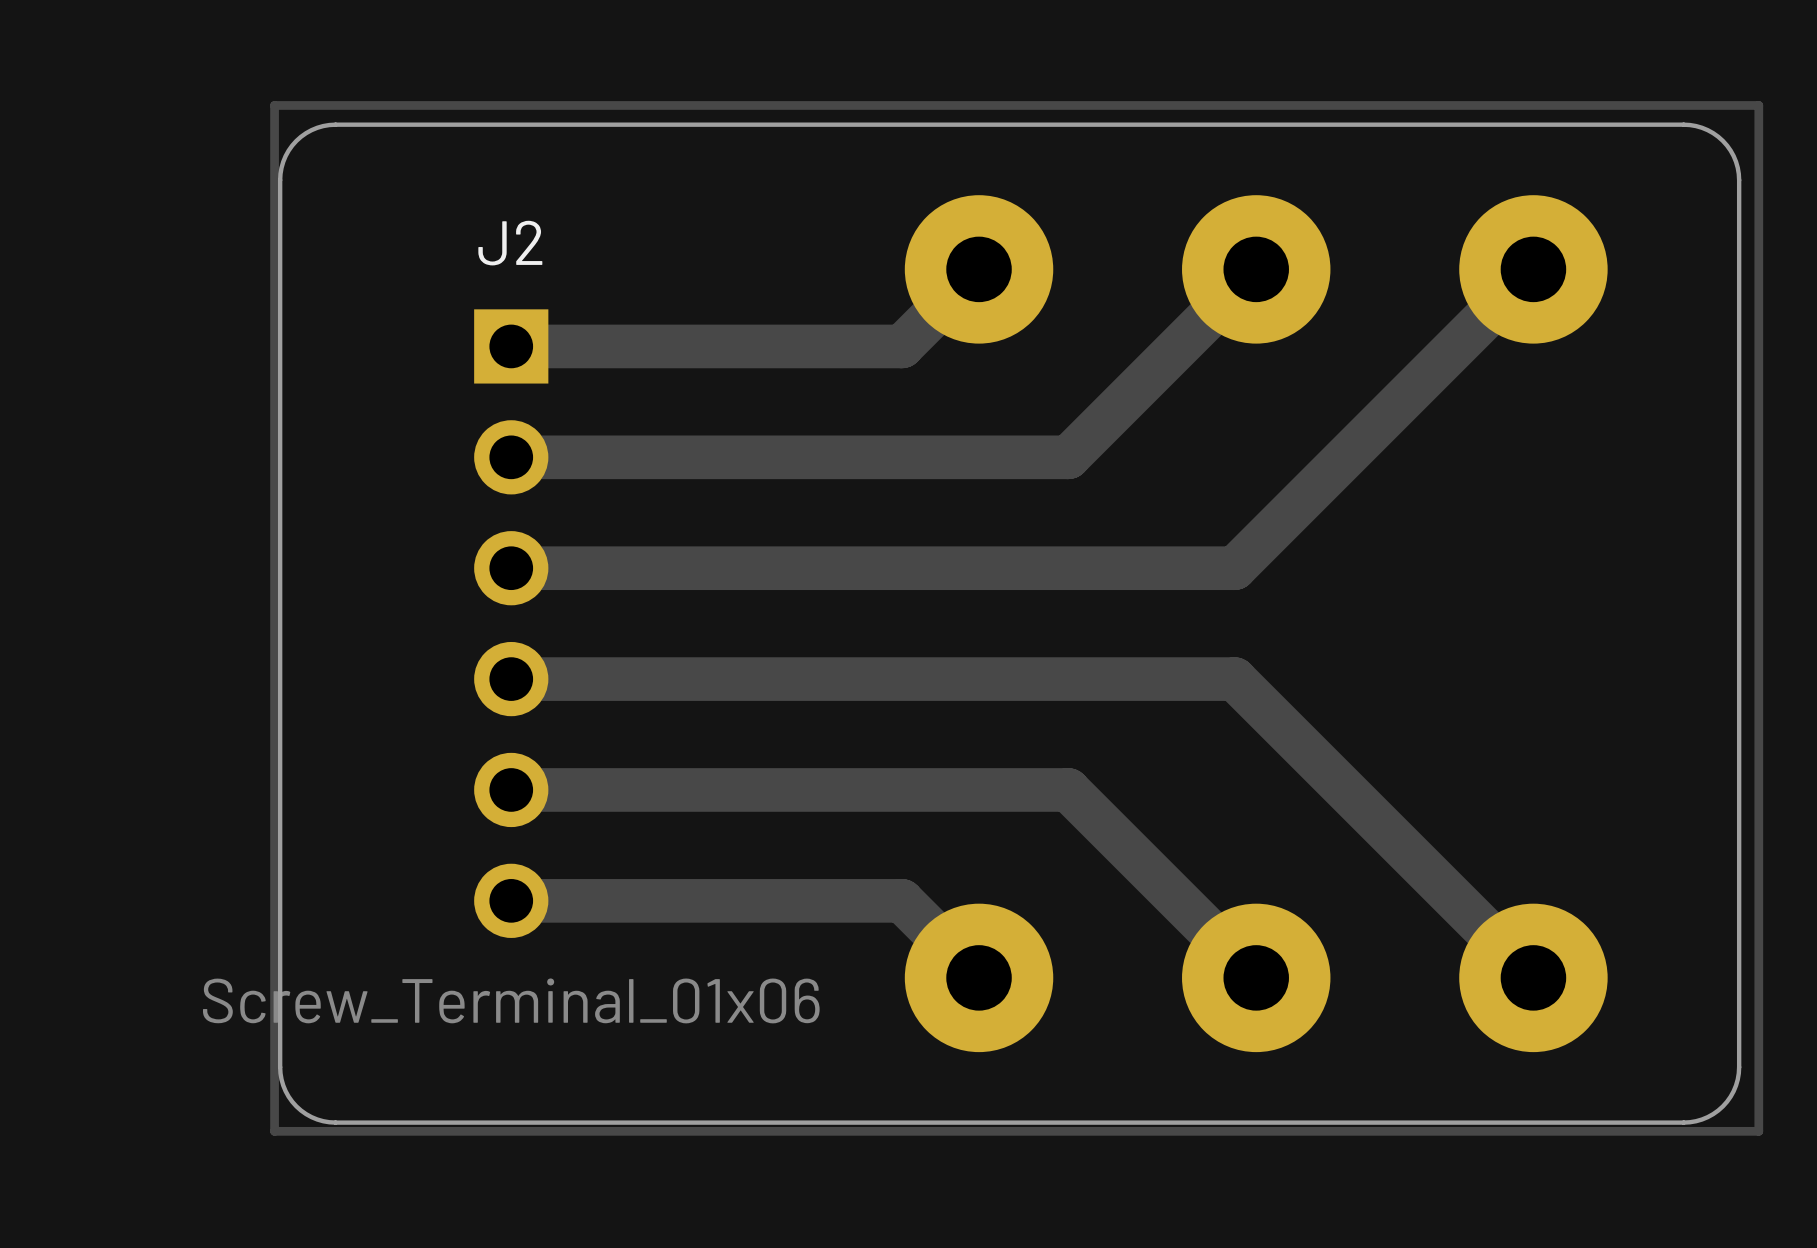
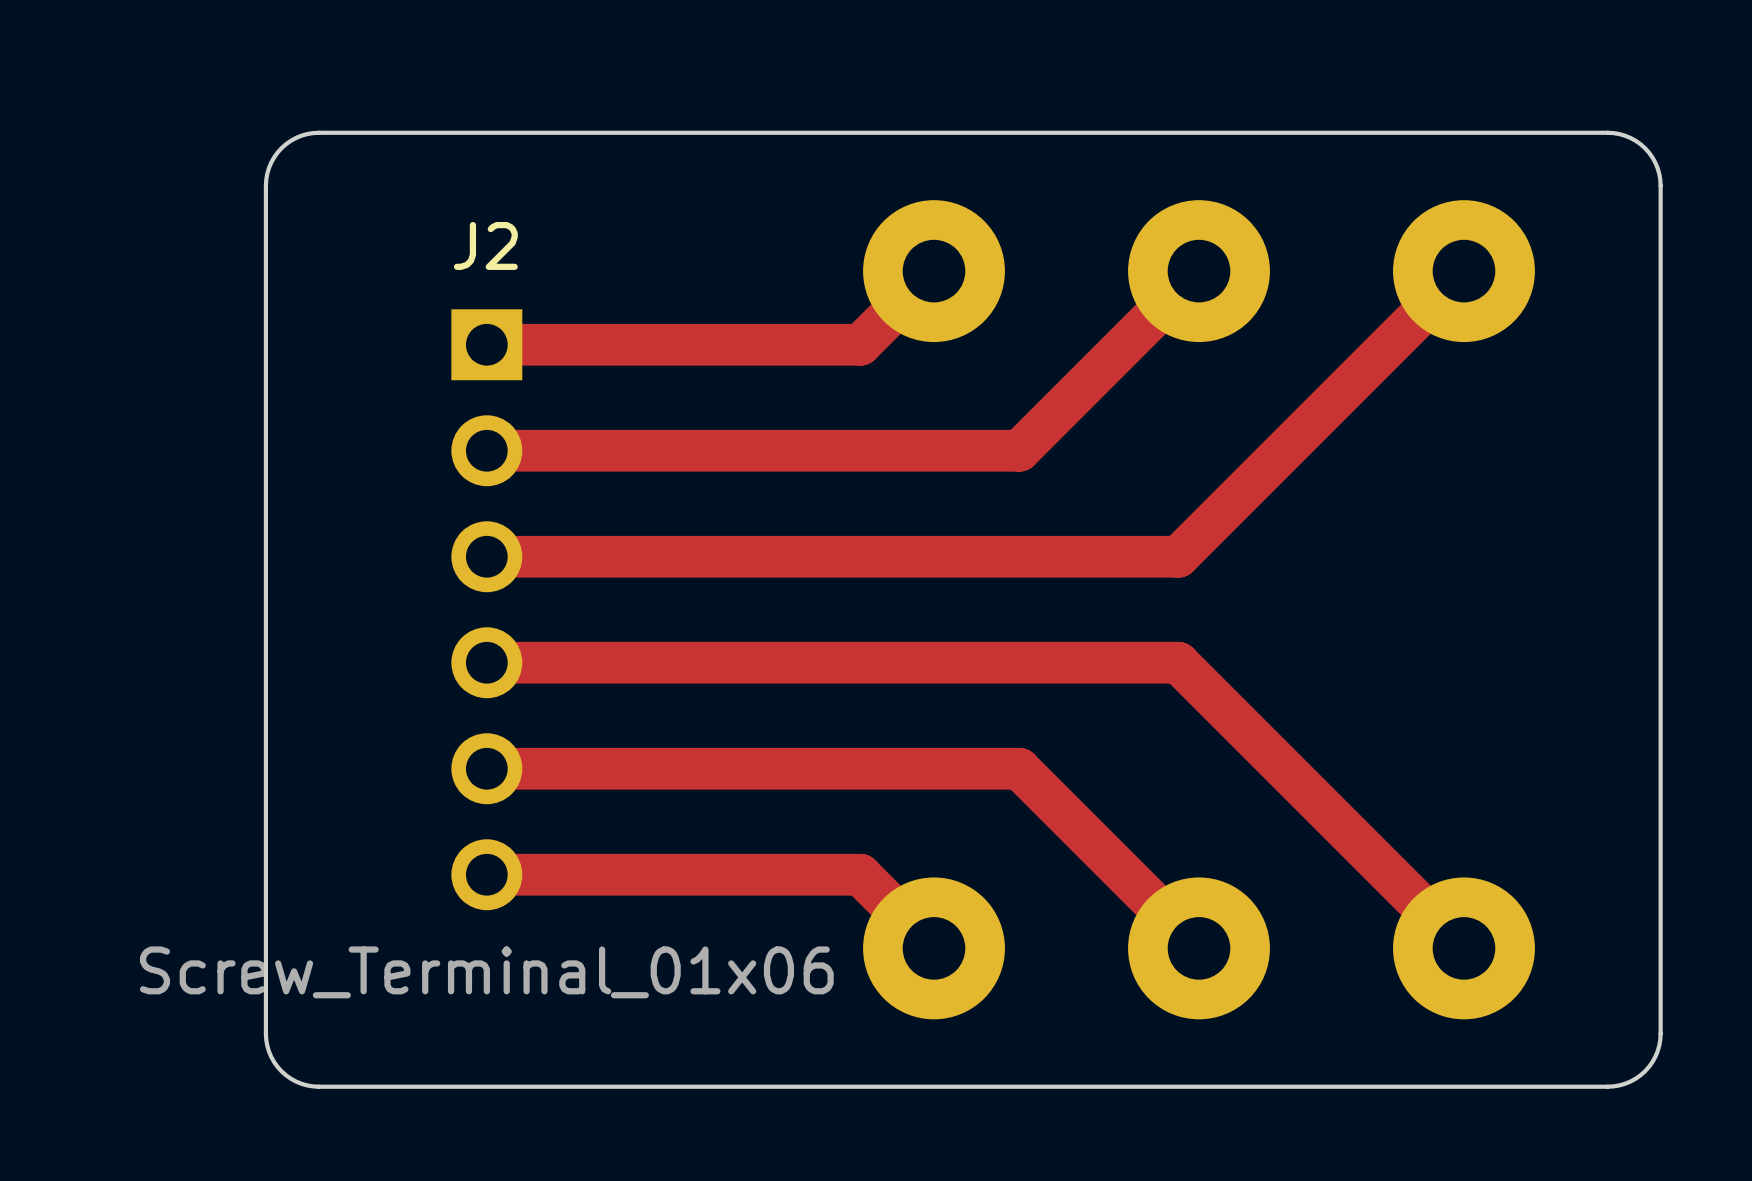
track: (274, 105) (1758, 105) (1758, 1131) (274, 1131) (274, 105) -> none

